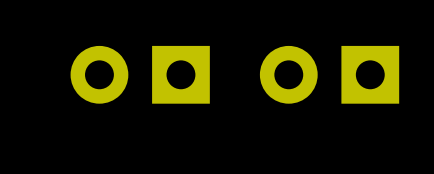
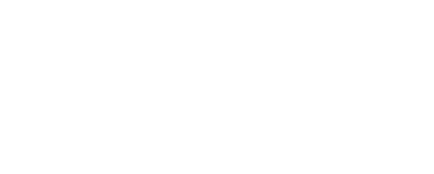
part: (140, 74) -> none
part: (329, 74) -> none

